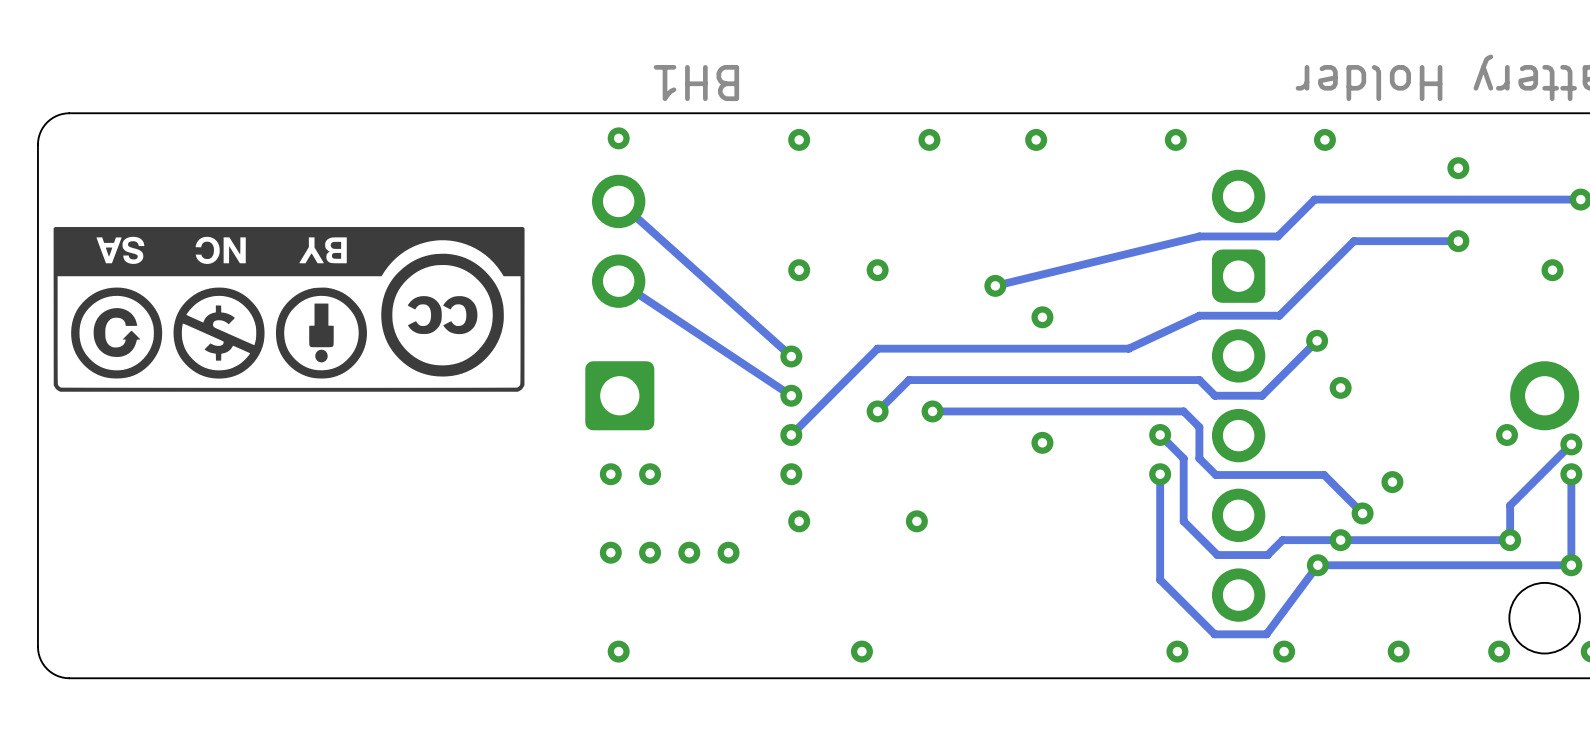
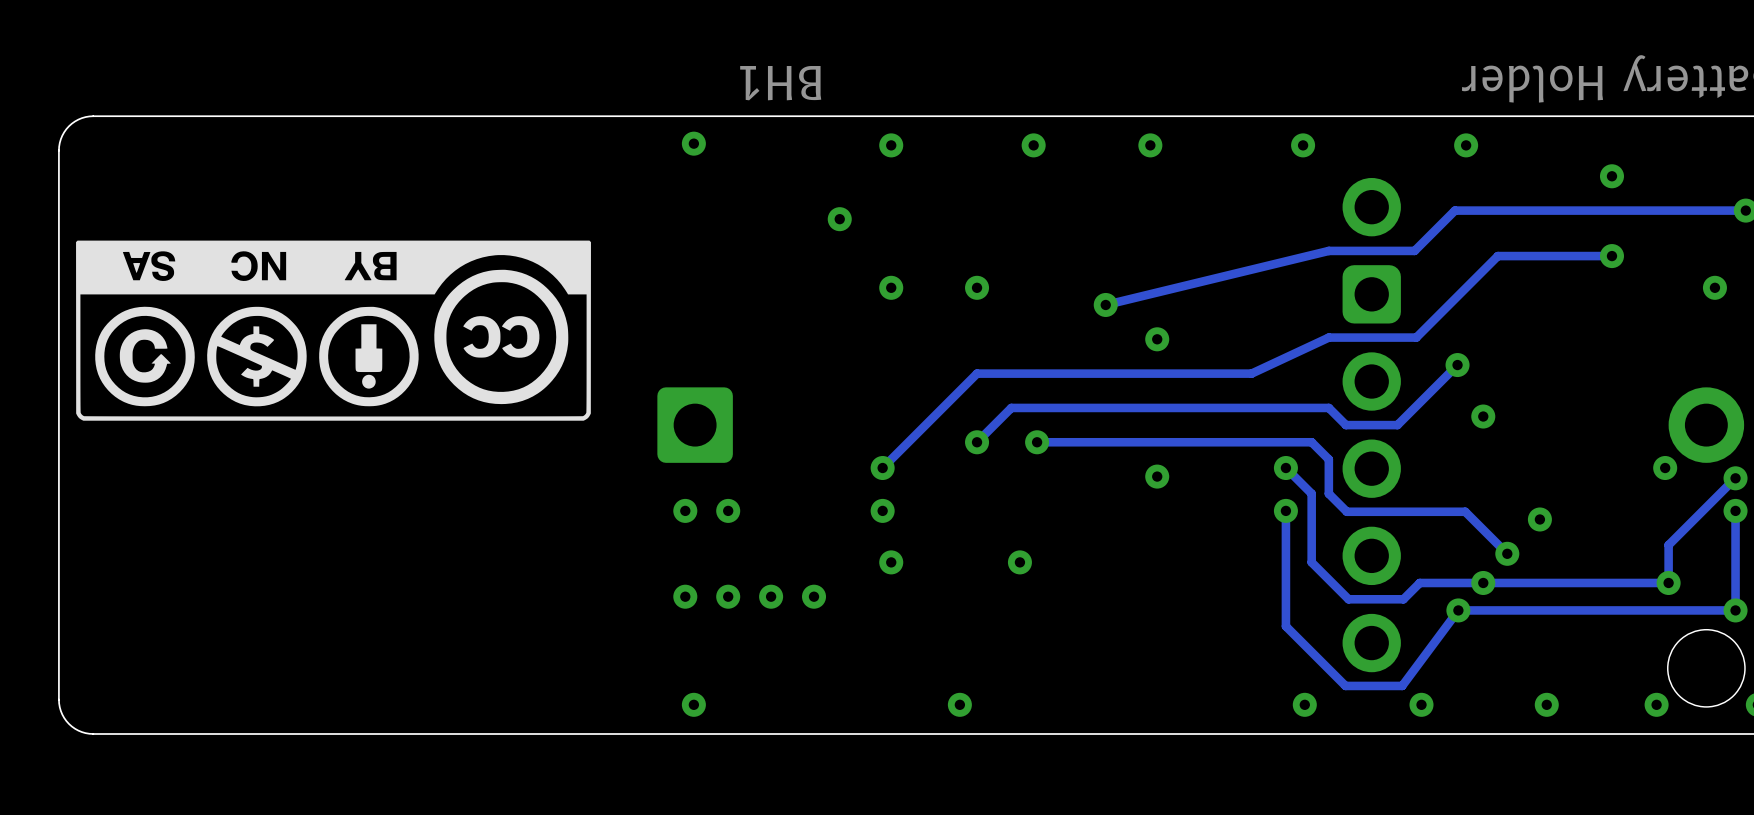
track: (618, 201) (791, 356) -> none
via: none -> (839, 219)
part: (618, 241) -> none
track: (618, 281) (791, 395) -> none
via: (791, 356) -> none
via: (791, 395) -> none

